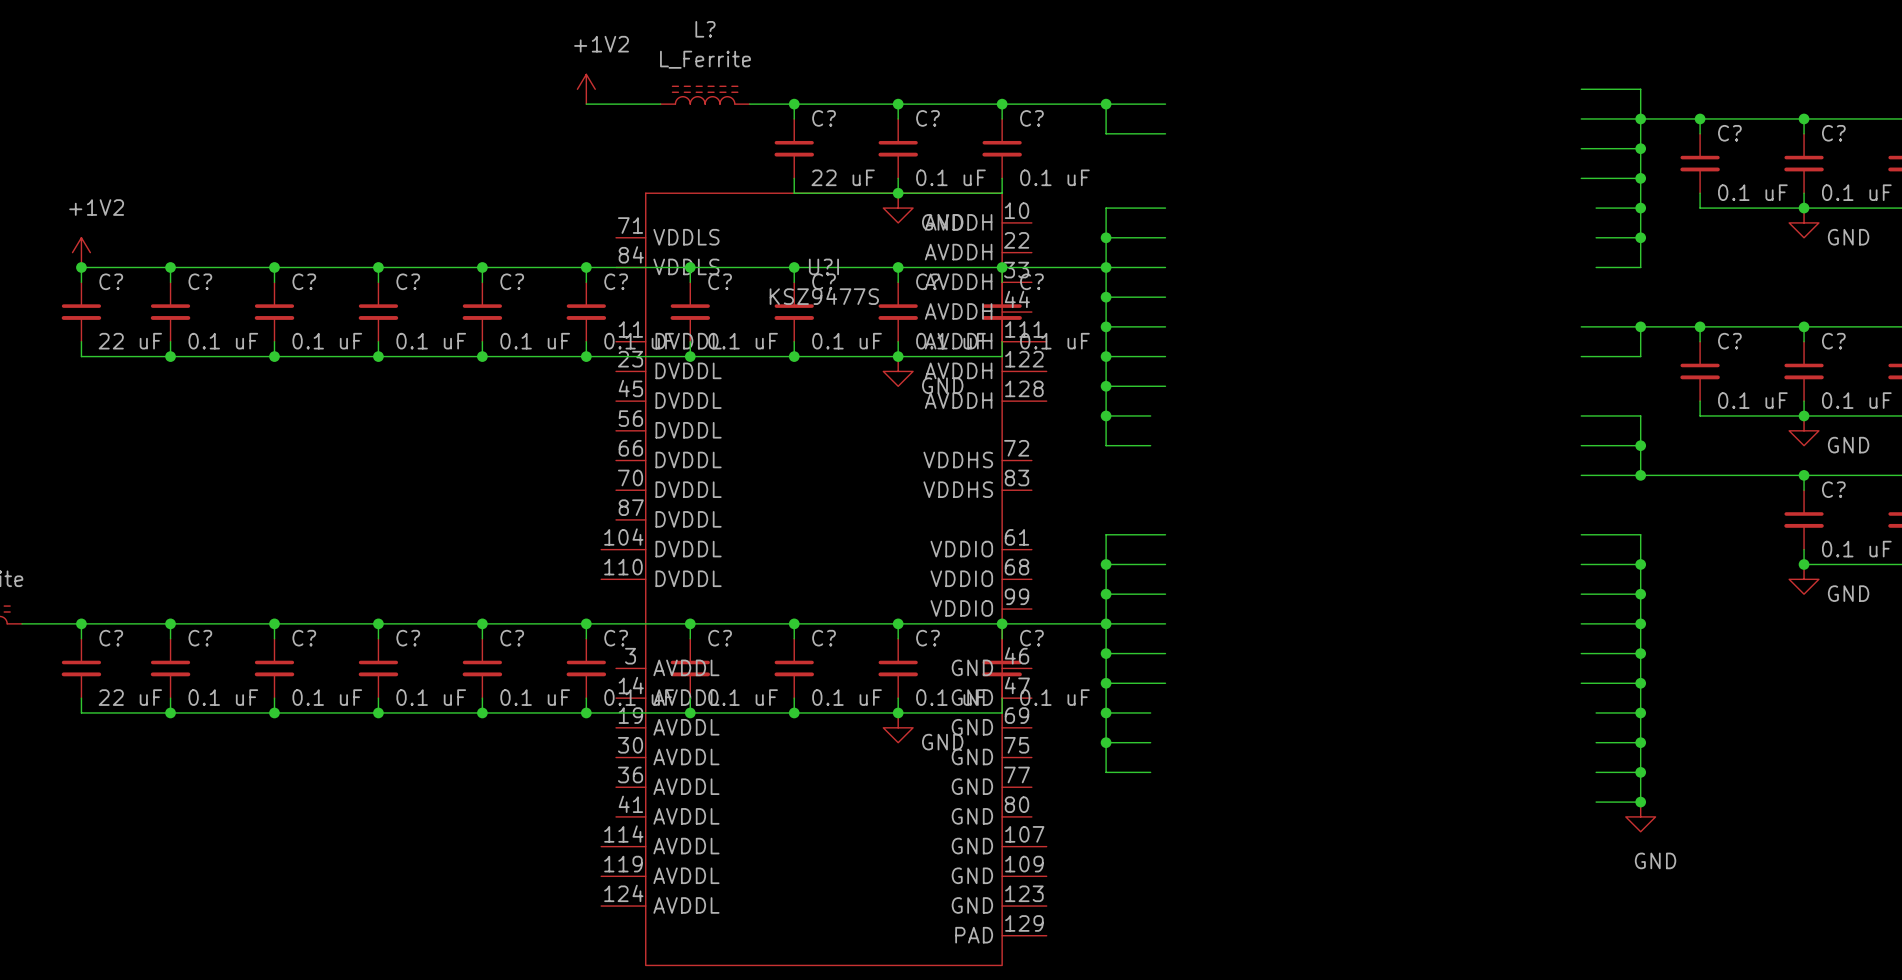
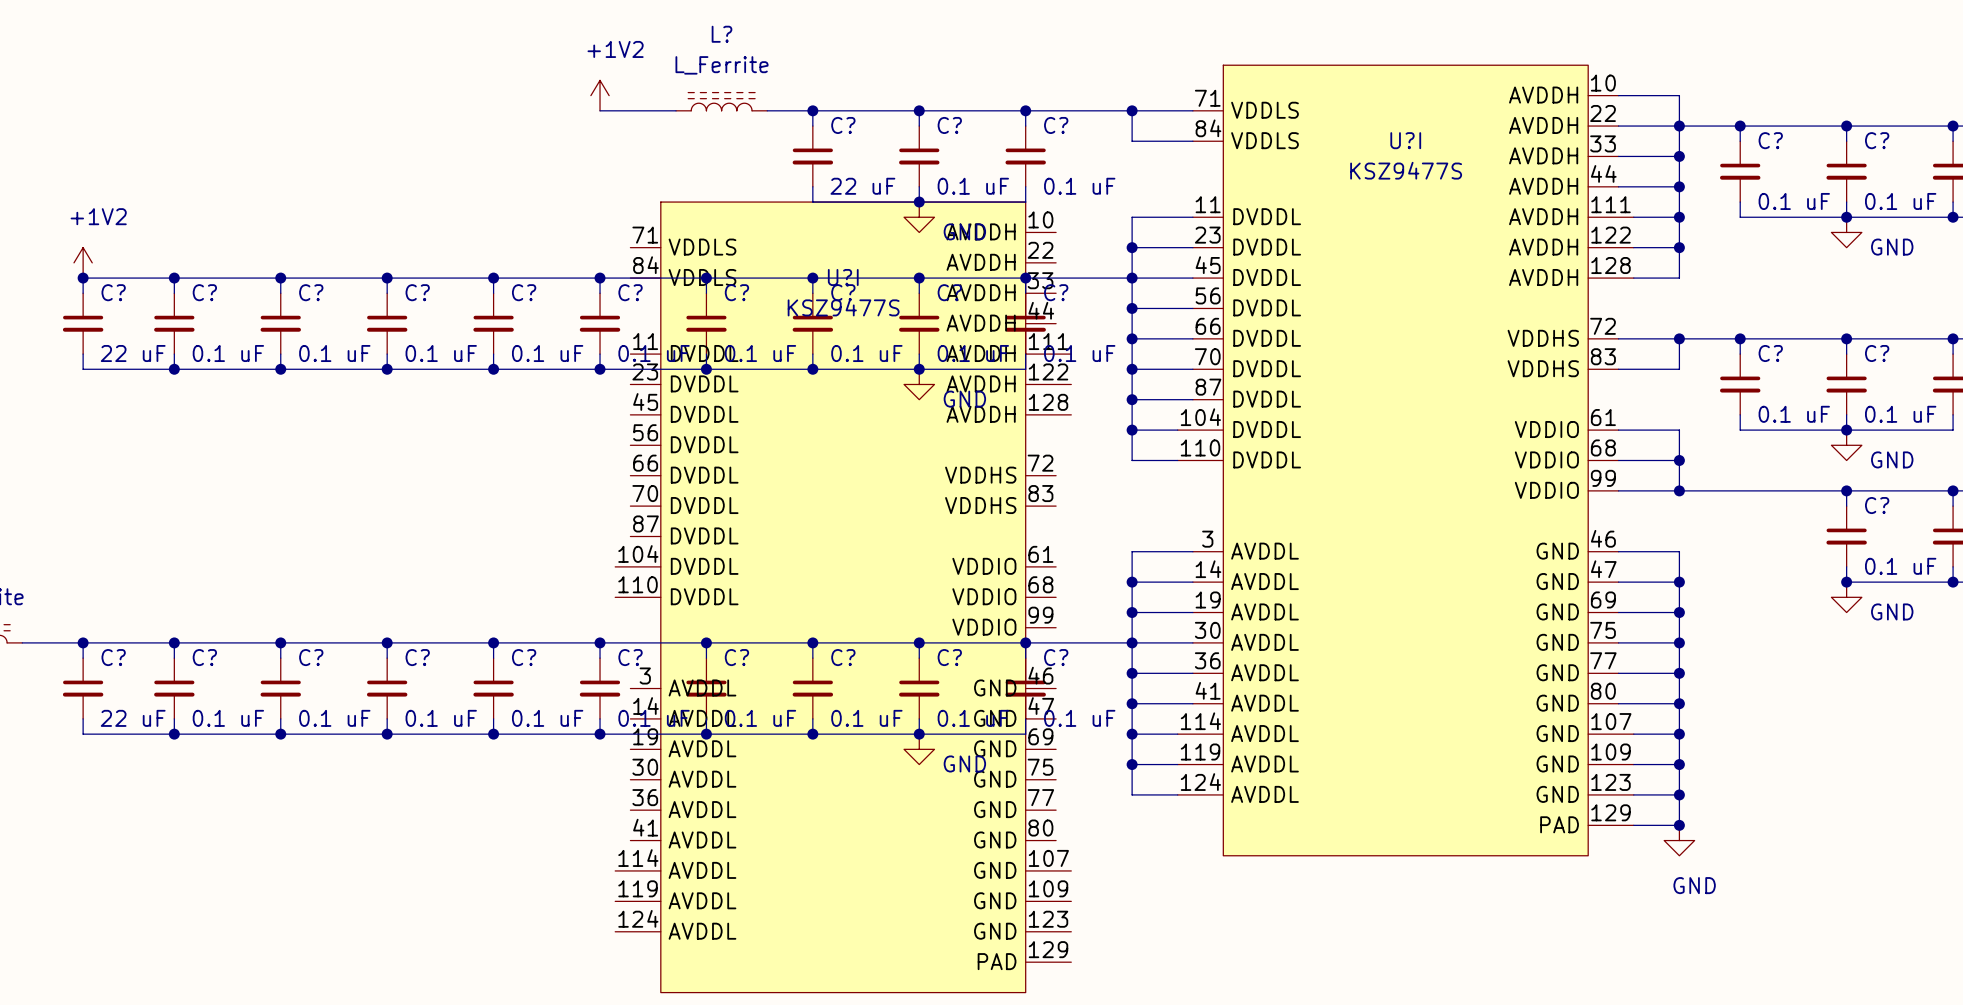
U?I: none -> KSZ9477S (1405, 460)

